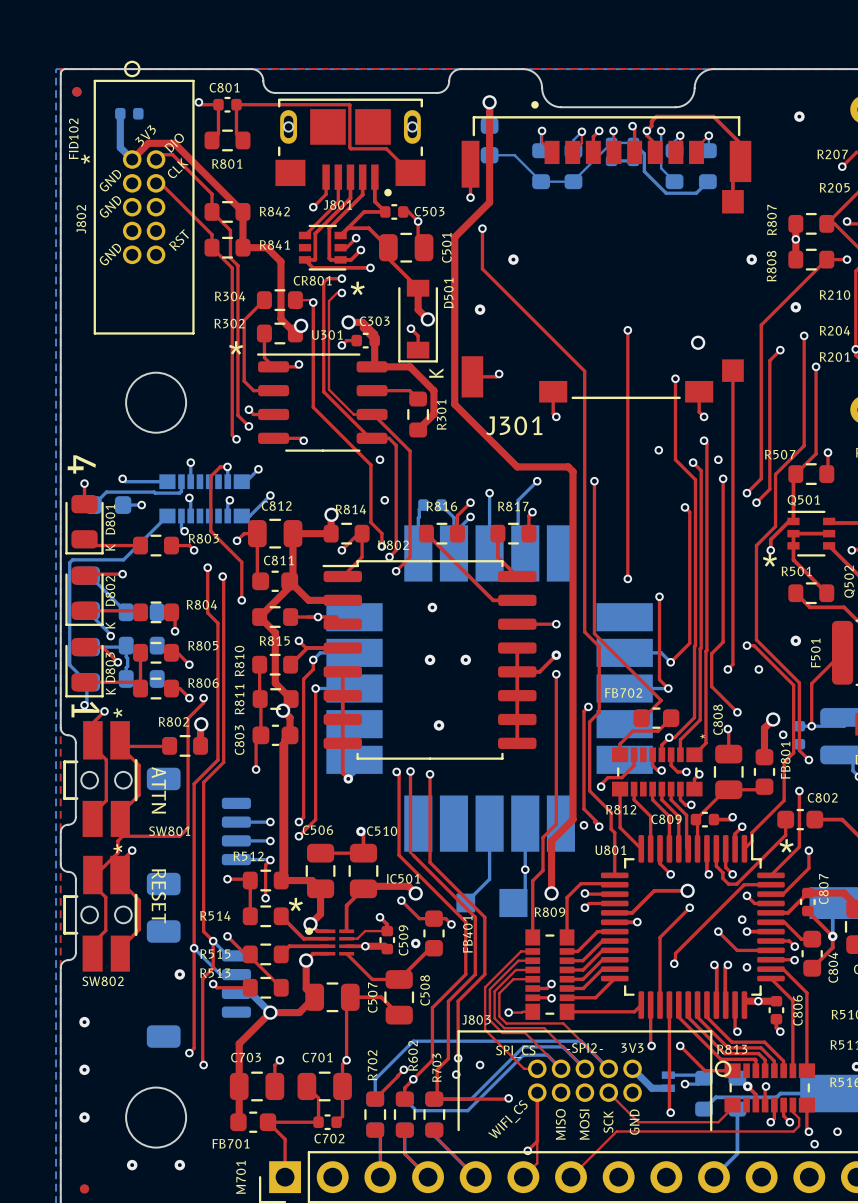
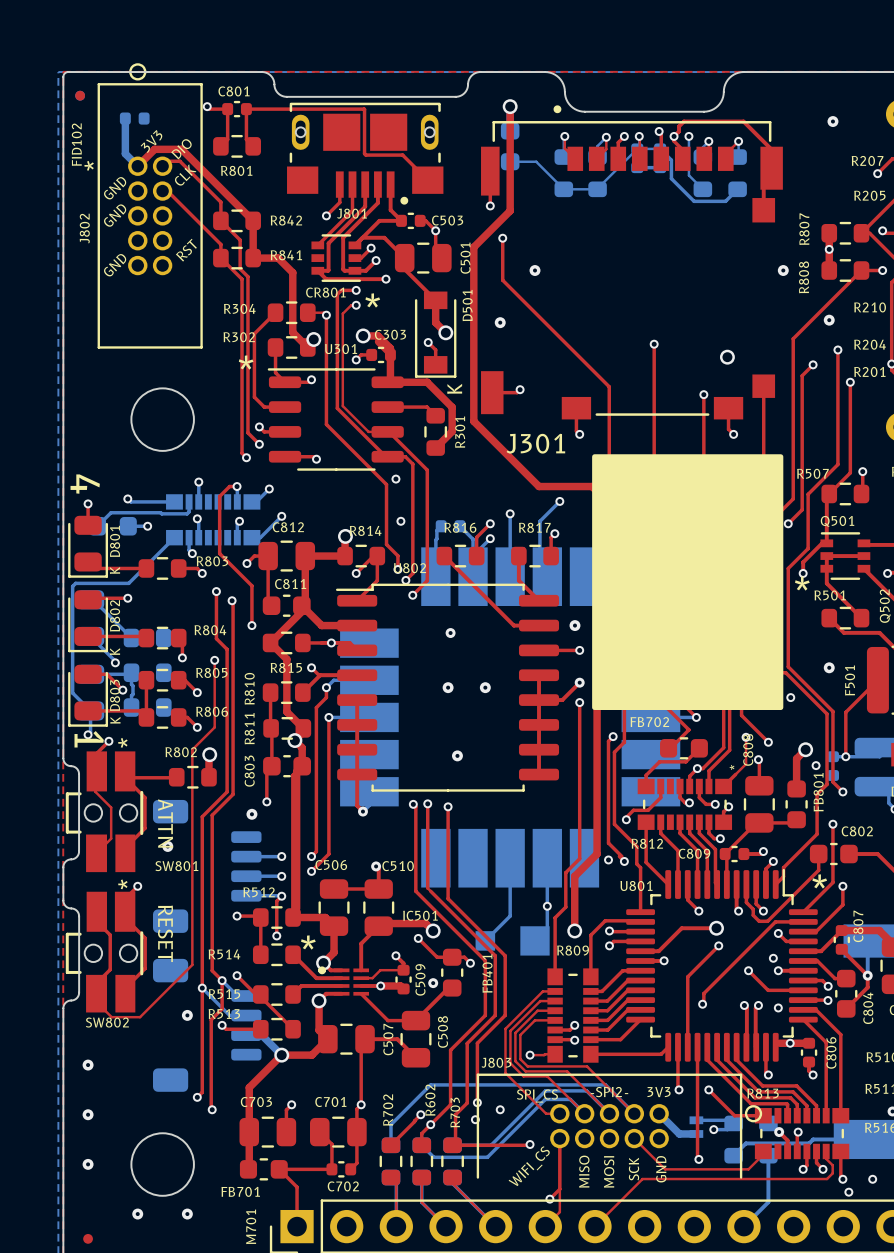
drawing: none -> [592, 454, 784, 711]
top track: (704, 440) (706, 443) (705, 743) -> (746, 737) (746, 764) (735, 774)
via: (704, 440) -> none
via: none -> (574, 625)
top track: none -> (214, 660) (214, 727) (192, 749) (192, 964) (140, 1017) (111, 1017) (96, 1002) (96, 993)
top track: (203, 698) (203, 702) (188, 718) (188, 828) (179, 836) (122, 836) (117, 841) (117, 852) (92, 877) -> none
via position: (203, 698) -> (214, 660)
via: none -> (746, 737)
top track: none -> (96, 771) (95, 791) (111, 807) (111, 838) (96, 853)
top track: (92, 746) (106, 759) (106, 800) (92, 813) -> none
via: none -> (251, 814)
via: none -> (167, 846)

